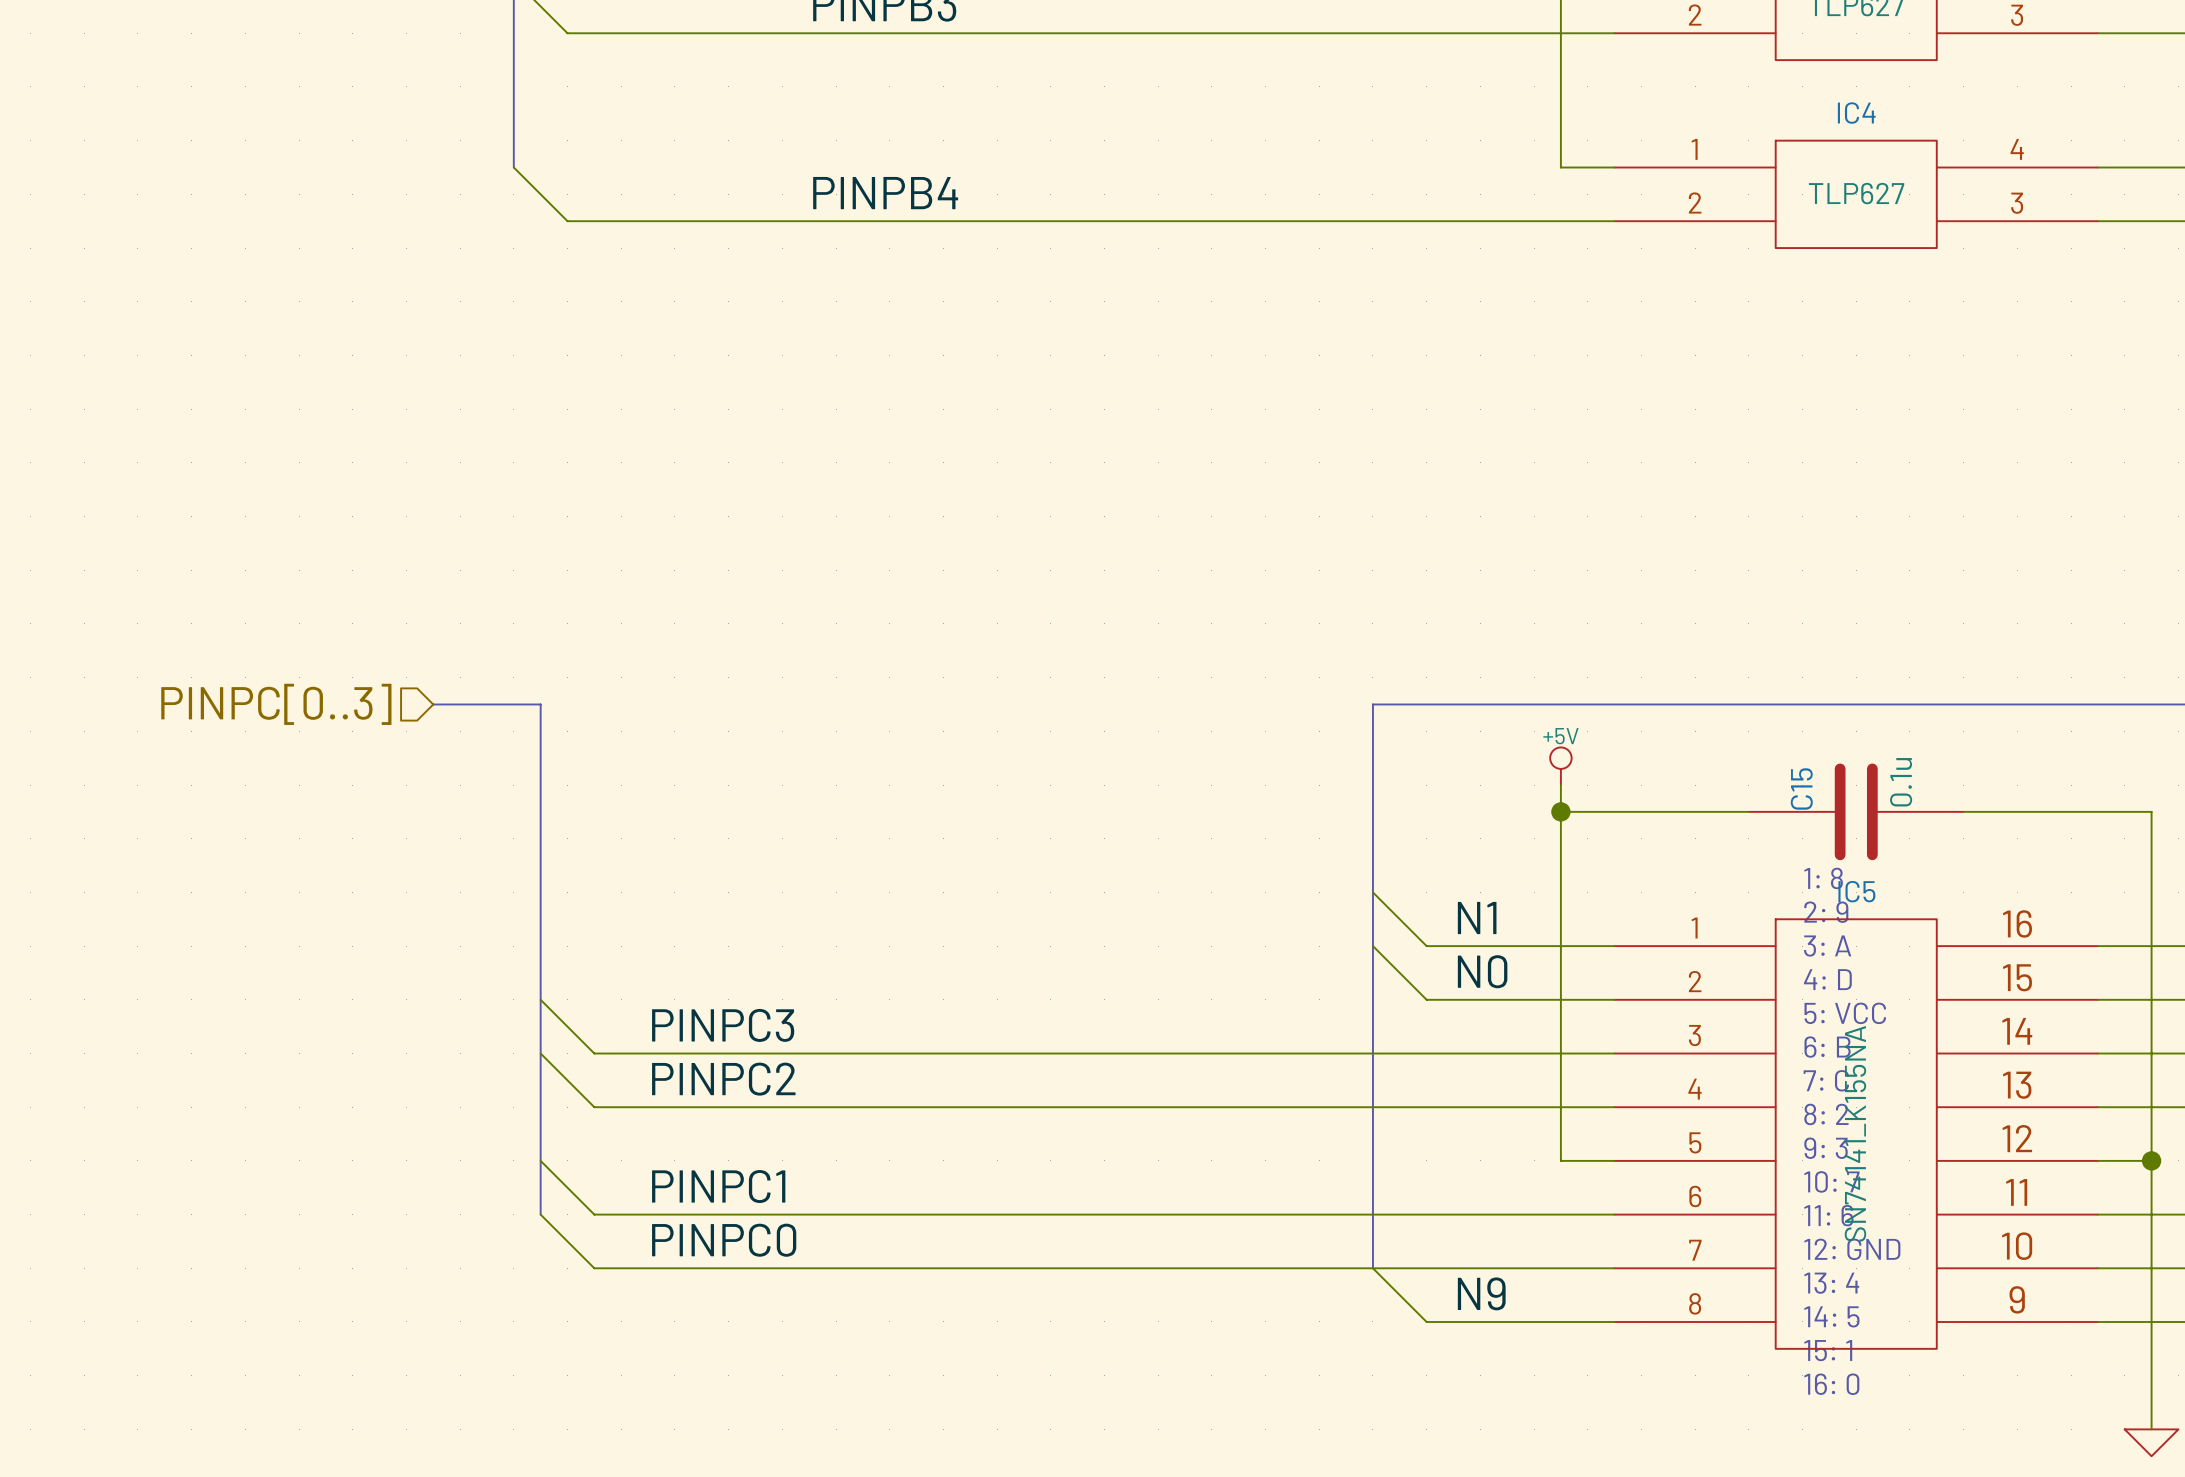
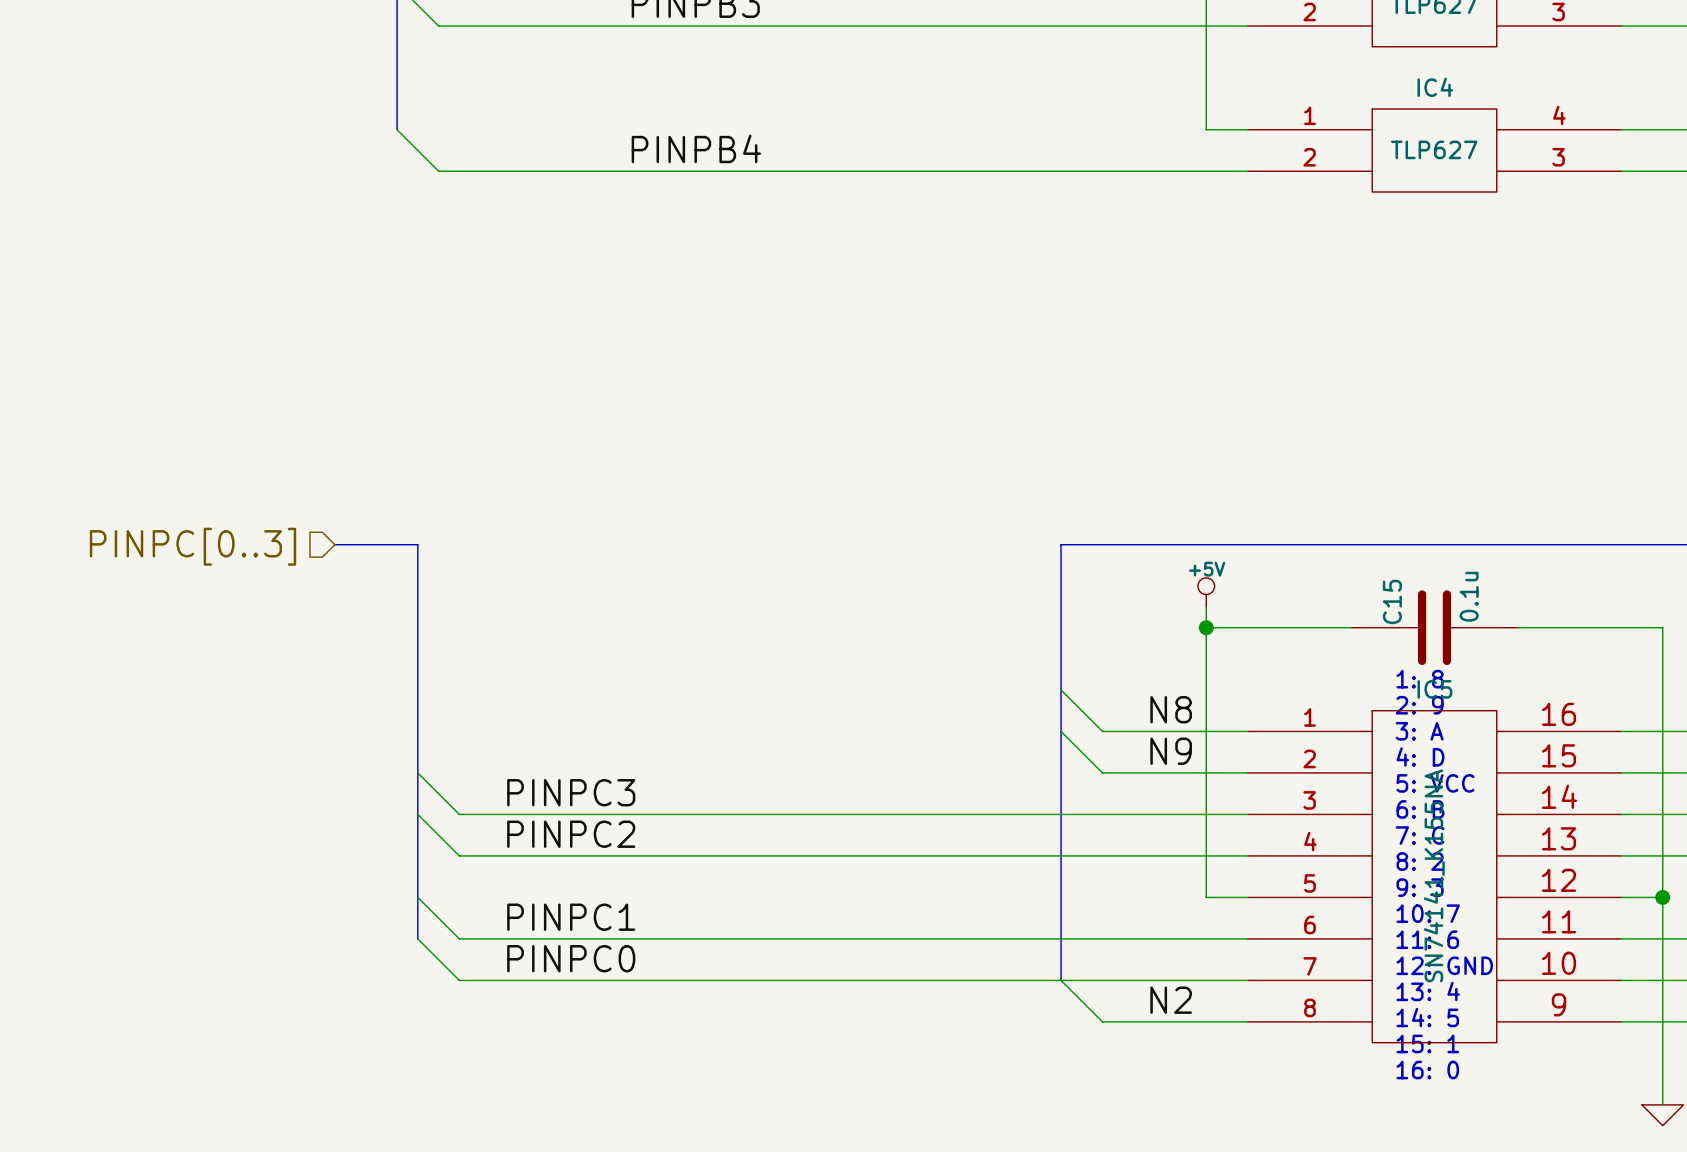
label: none -> N8 (1171, 709)
label: N1 (1477, 918) -> none
label: N0 (1482, 971) -> none
label position: N9 (1481, 1293) -> N9 (1171, 751)
label: none -> N2 (1171, 1000)

